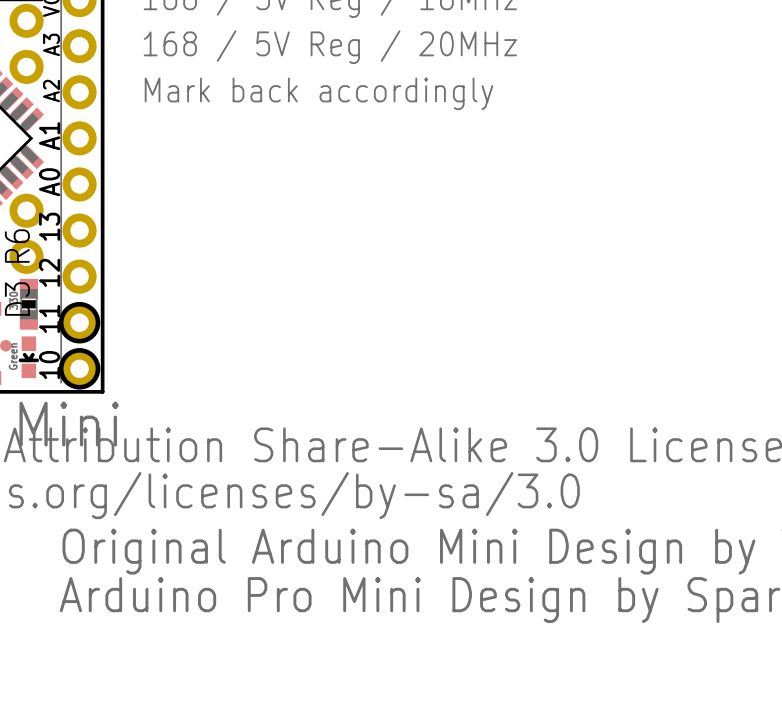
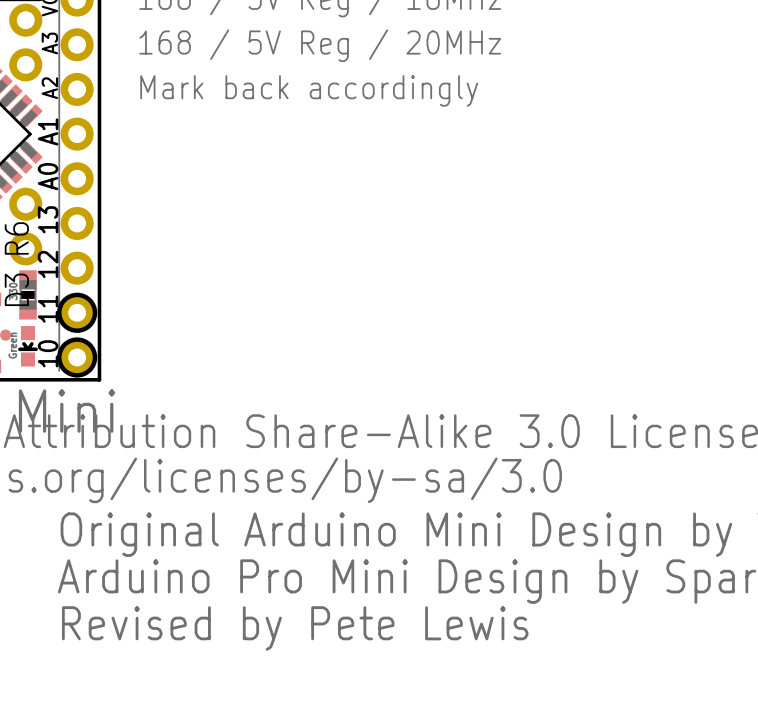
text: none -> Revised by Pete Lewis (295, 628)

